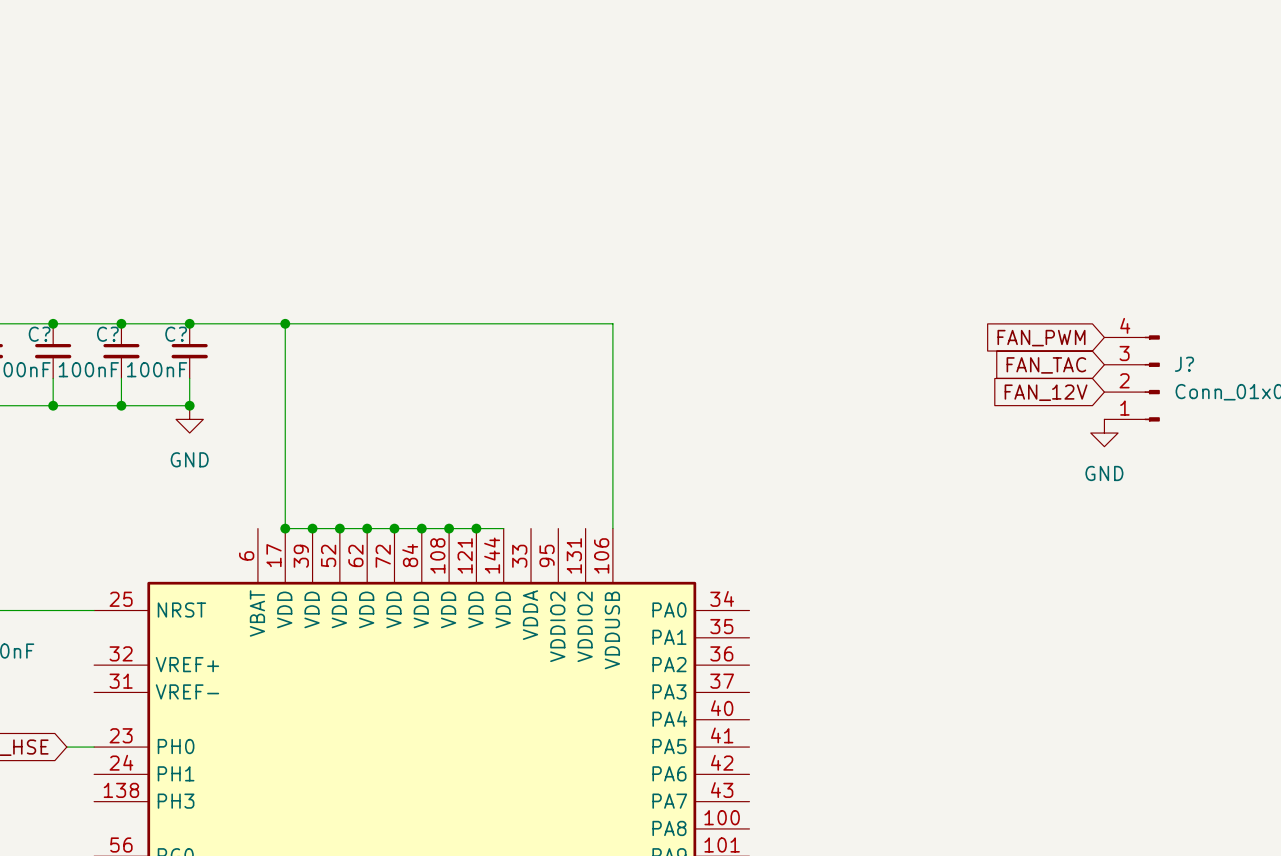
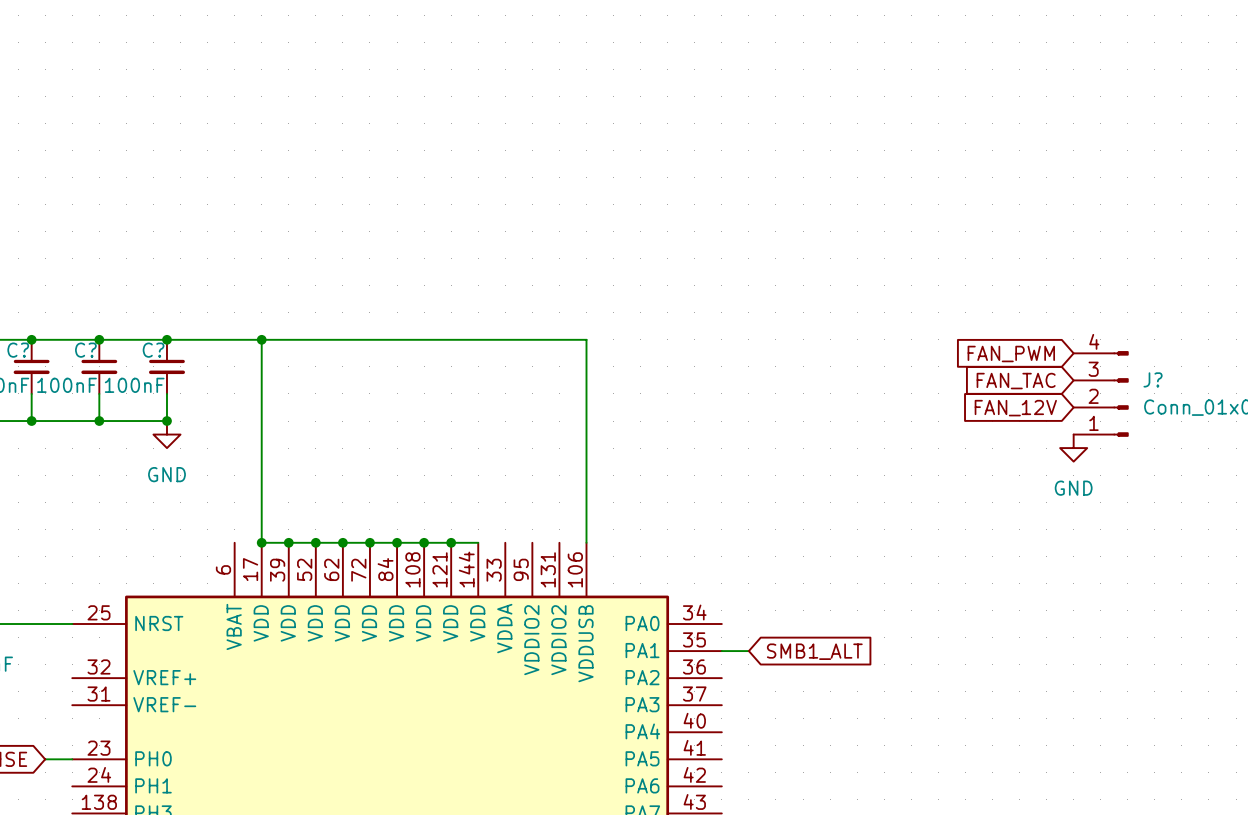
wire: none -> (721, 651) (748, 651)
global label: none -> SMB1_ALT (814, 651)

